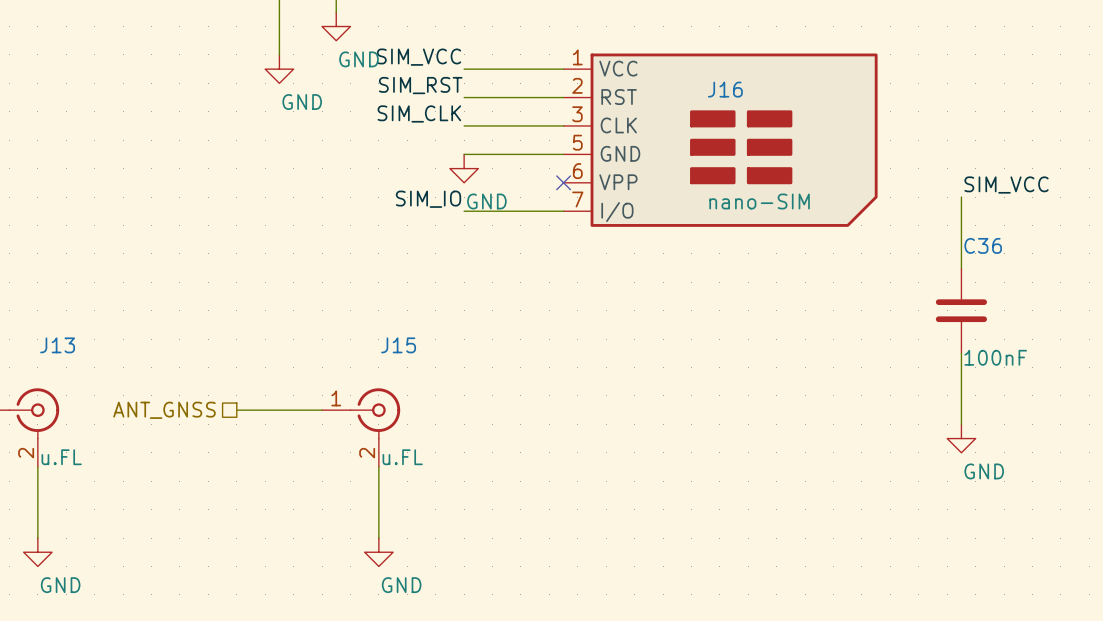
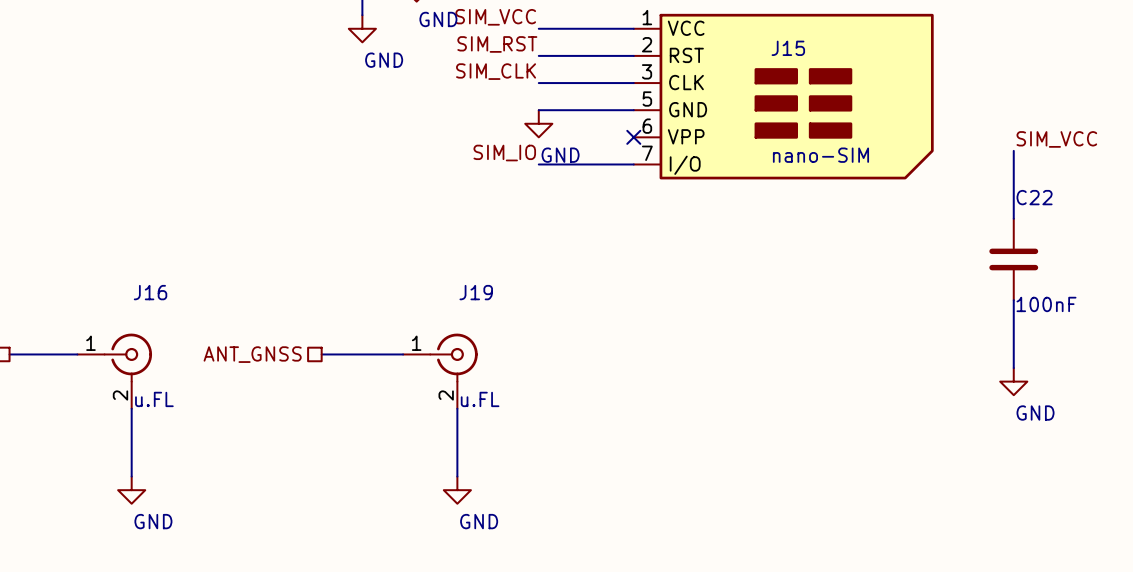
J16 name: J16 (725, 89) -> J15 (788, 48)
C36 name: C36 (983, 245) -> C22 (1034, 197)
J13 name: J13 (57, 345) -> J16 (150, 292)
J15 name: J15 (398, 345) -> J19 (476, 292)

